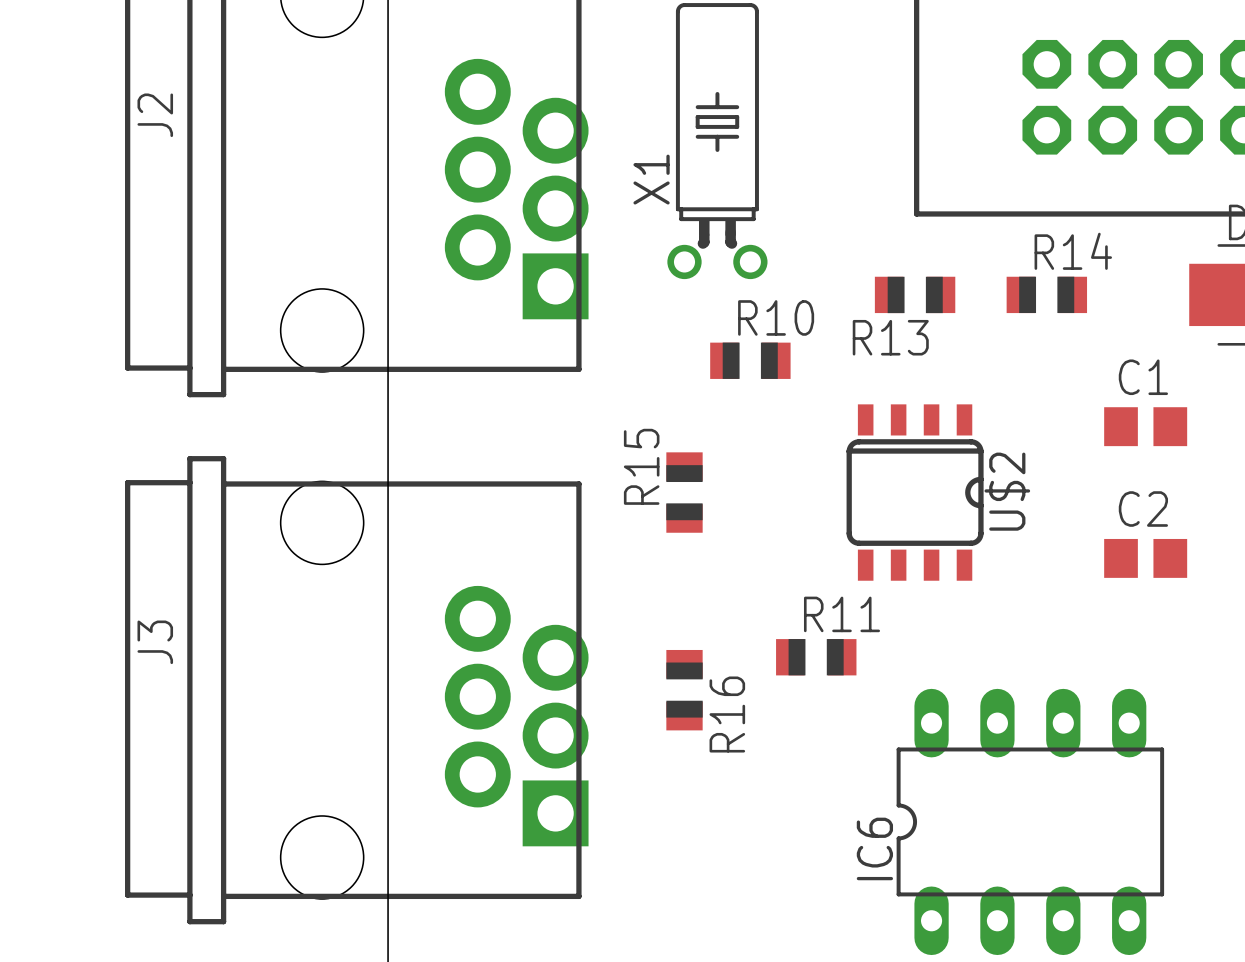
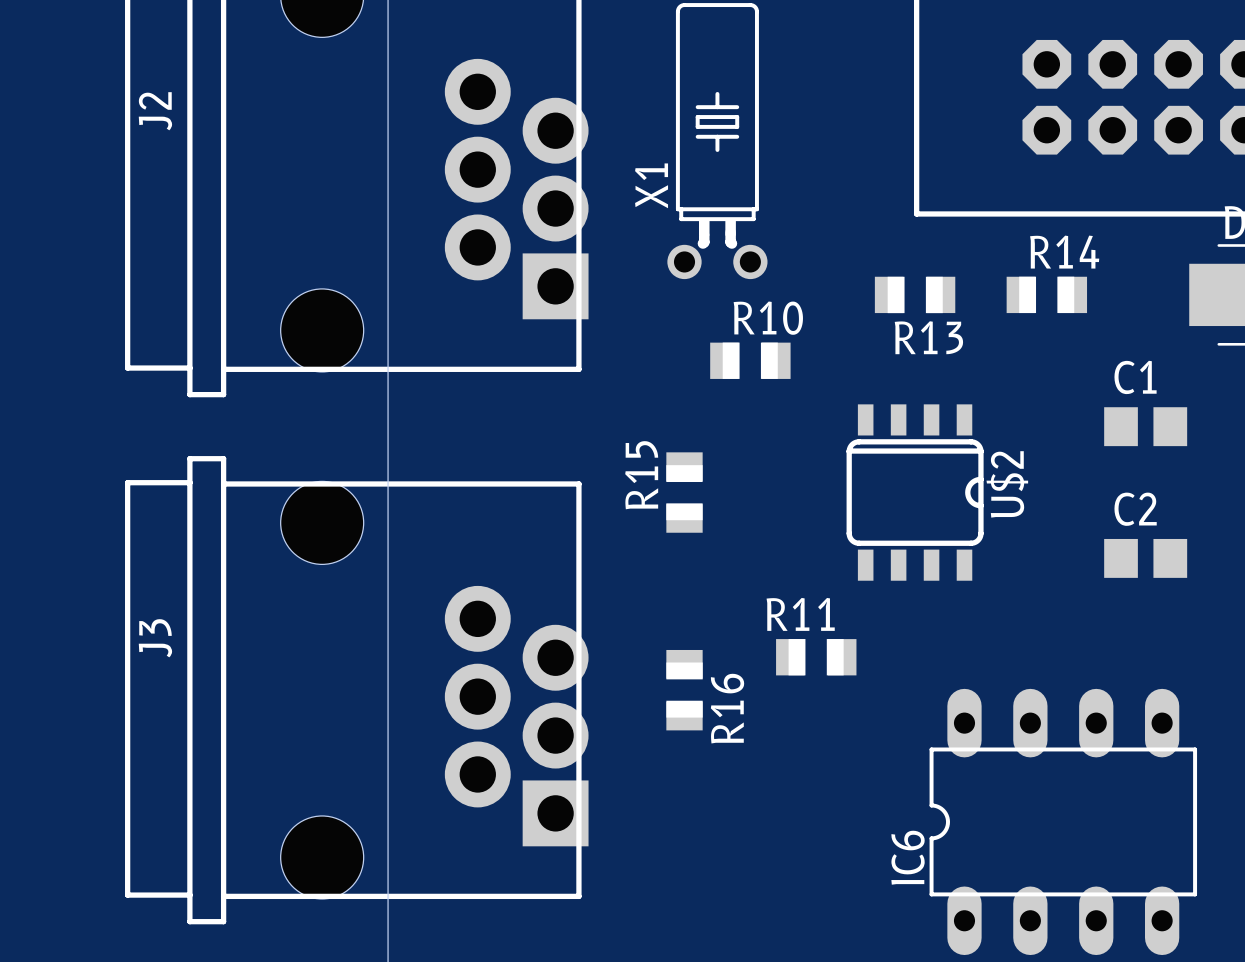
R13 name position: R13 (890, 337) -> R13 (928, 337)
R11 name position: R11 (841, 614) -> R11 (800, 614)
IC6 position: (1030, 821) -> (1063, 821)

